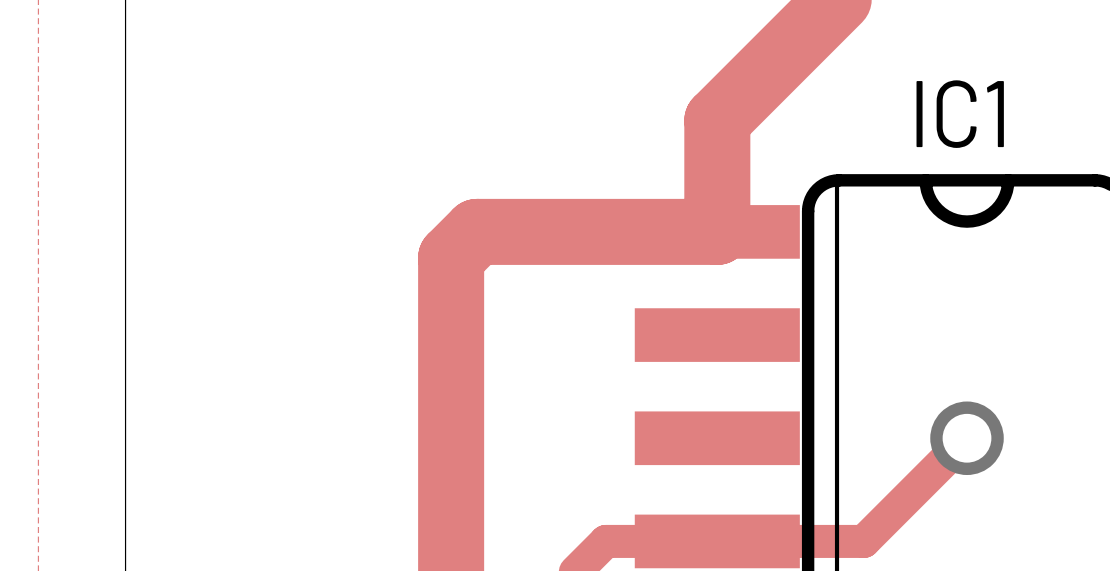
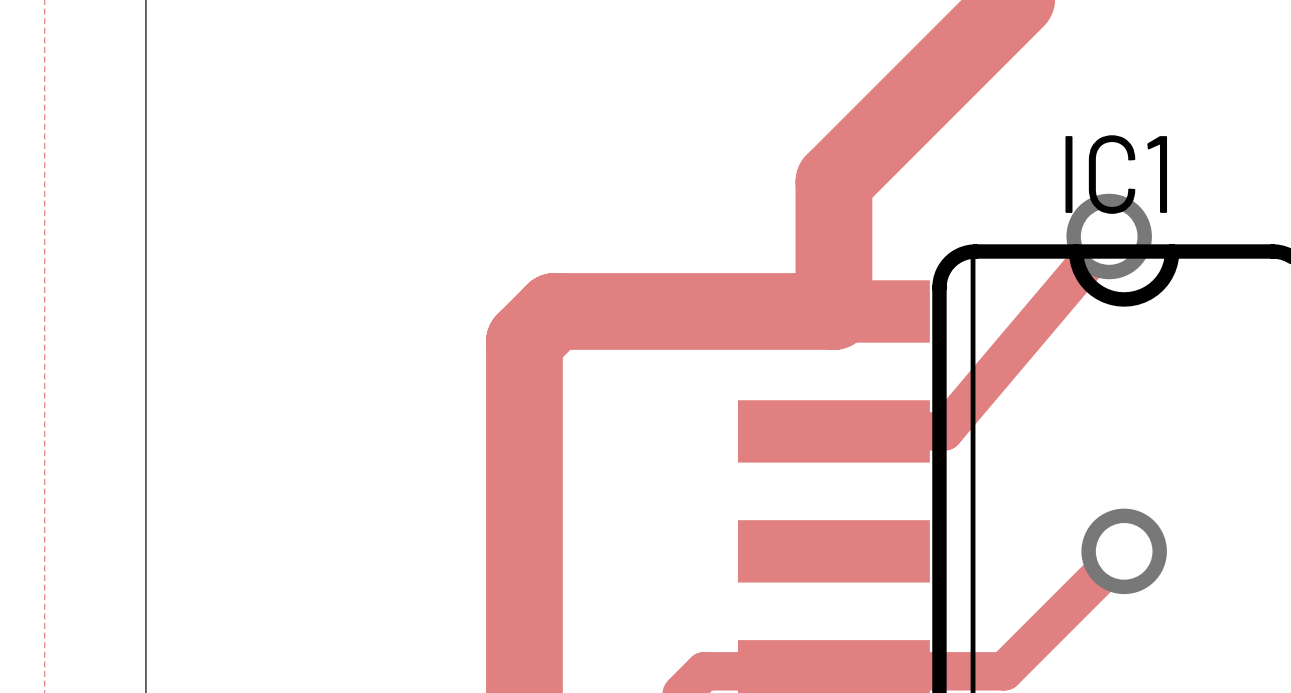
track: none -> (1109, 236) (944, 431) (833, 431)
via: none -> (1109, 236)

